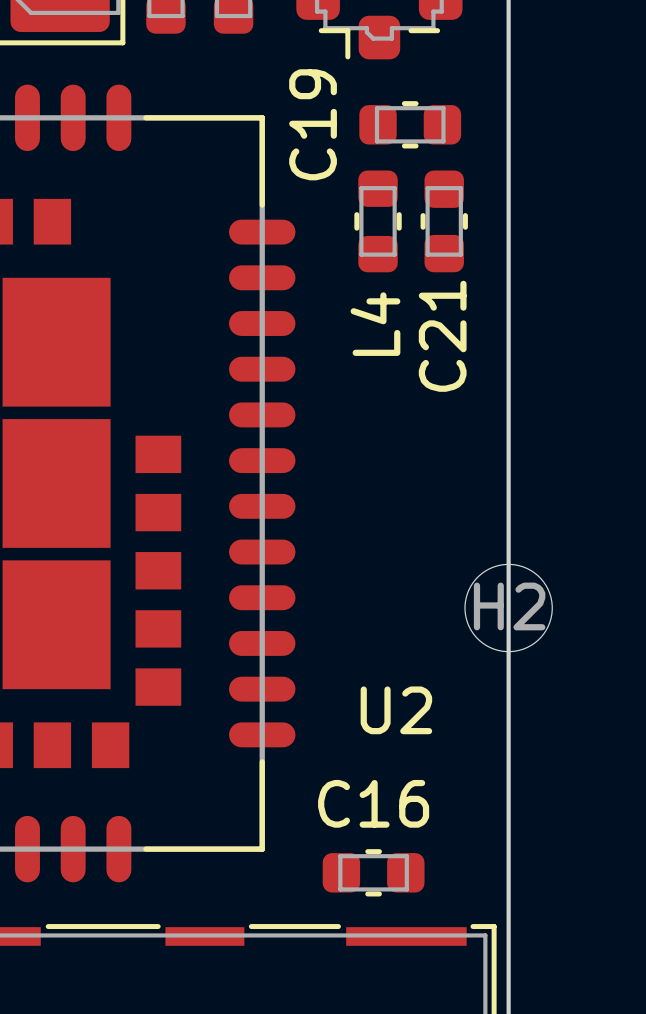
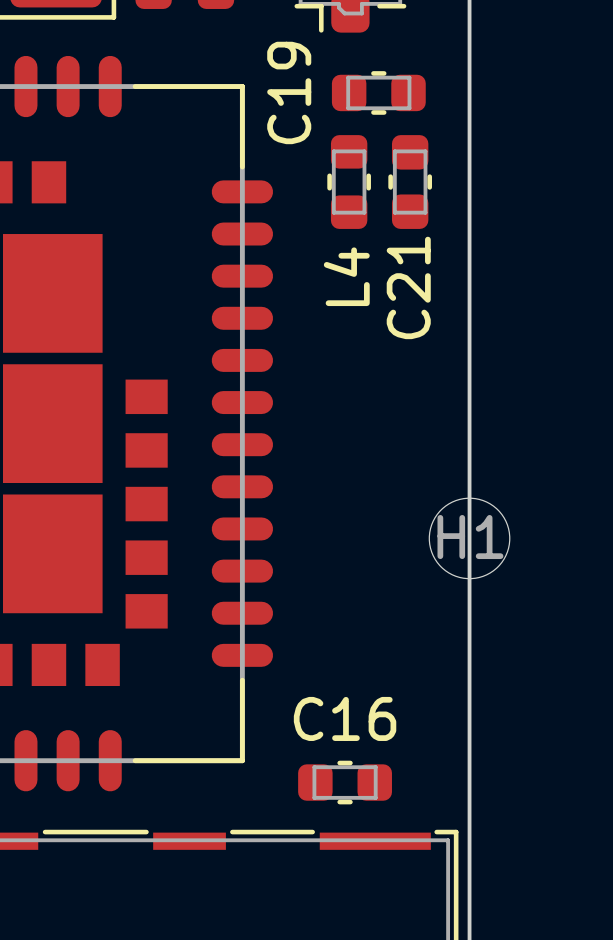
H2 name: H2 (509, 606) -> H1 (470, 537)
U2 name: U2 (396, 710) -> none

